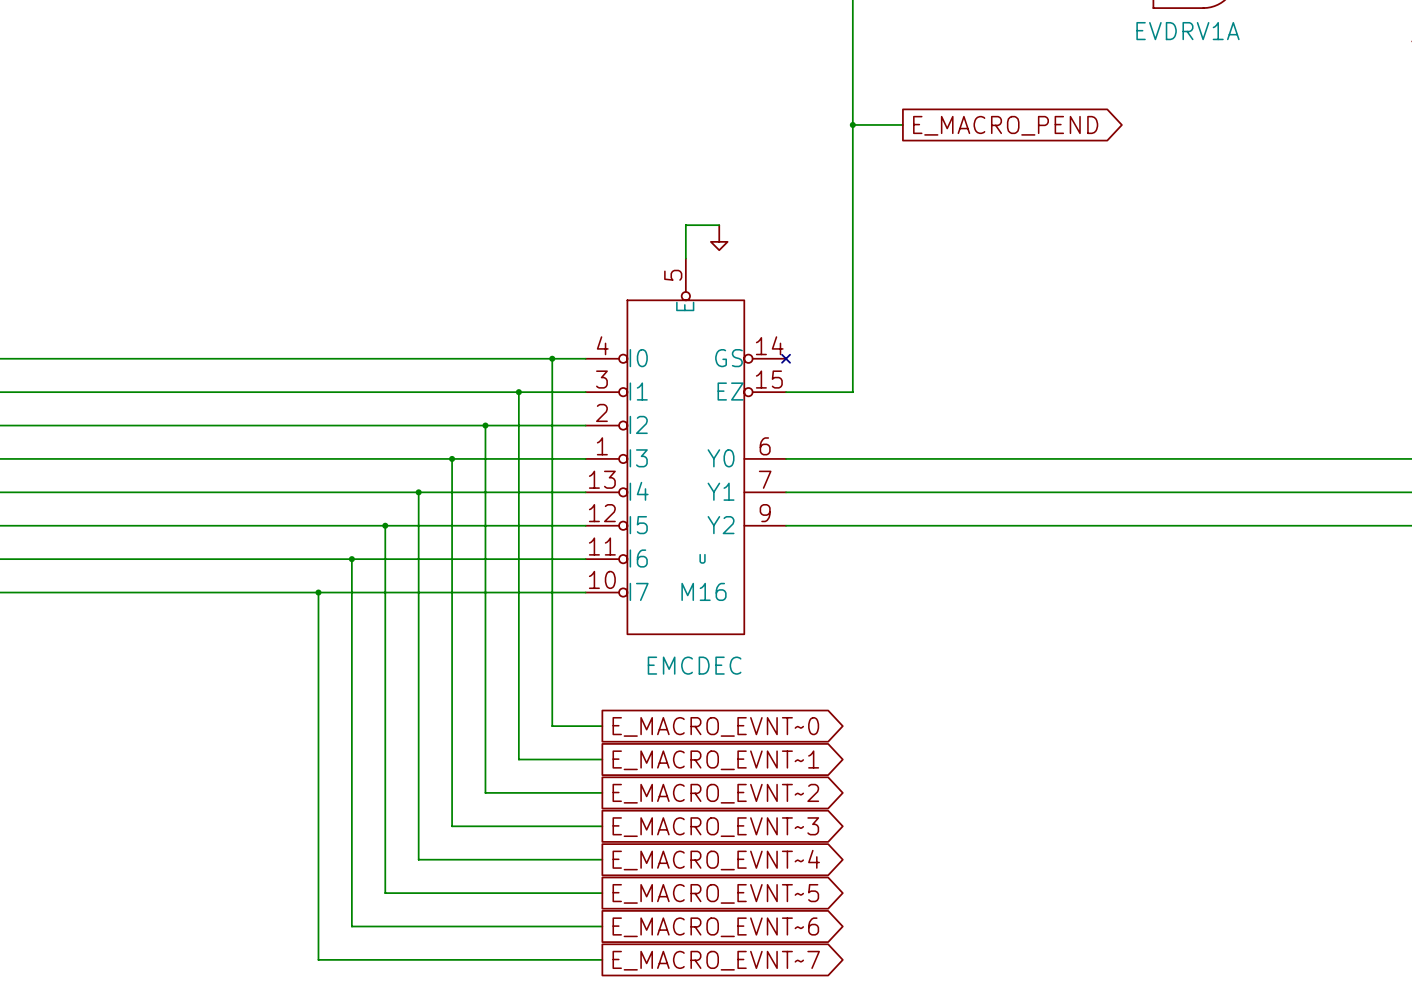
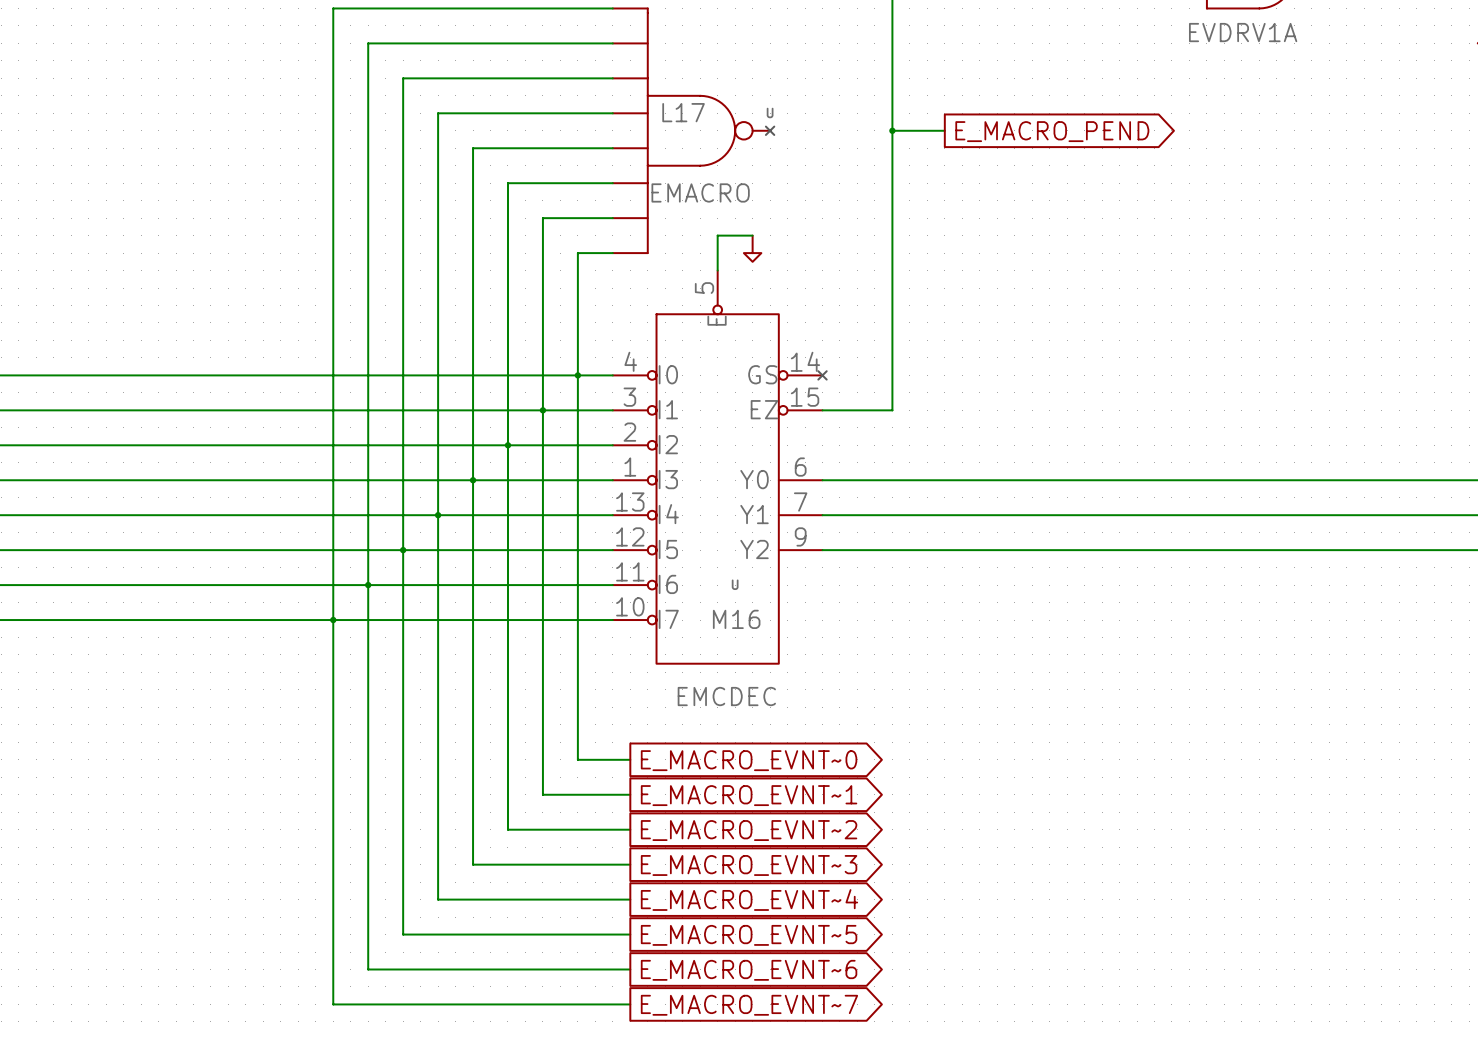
wire: none -> (612, 8) (333, 8) (333, 620)
wire: none -> (612, 43) (368, 43) (368, 585)
wire: none -> (612, 78) (403, 78) (403, 550)
wire: none -> (612, 113) (438, 113) (438, 515)
U: none -> (691, 130)
no-connect mark: none -> (770, 130)
wire: none -> (612, 148) (473, 148) (473, 480)
wire: none -> (612, 183) (507, 183) (507, 445)
wire: none -> (612, 218) (542, 218) (542, 410)
wire: none -> (612, 253) (577, 253) (577, 375)

